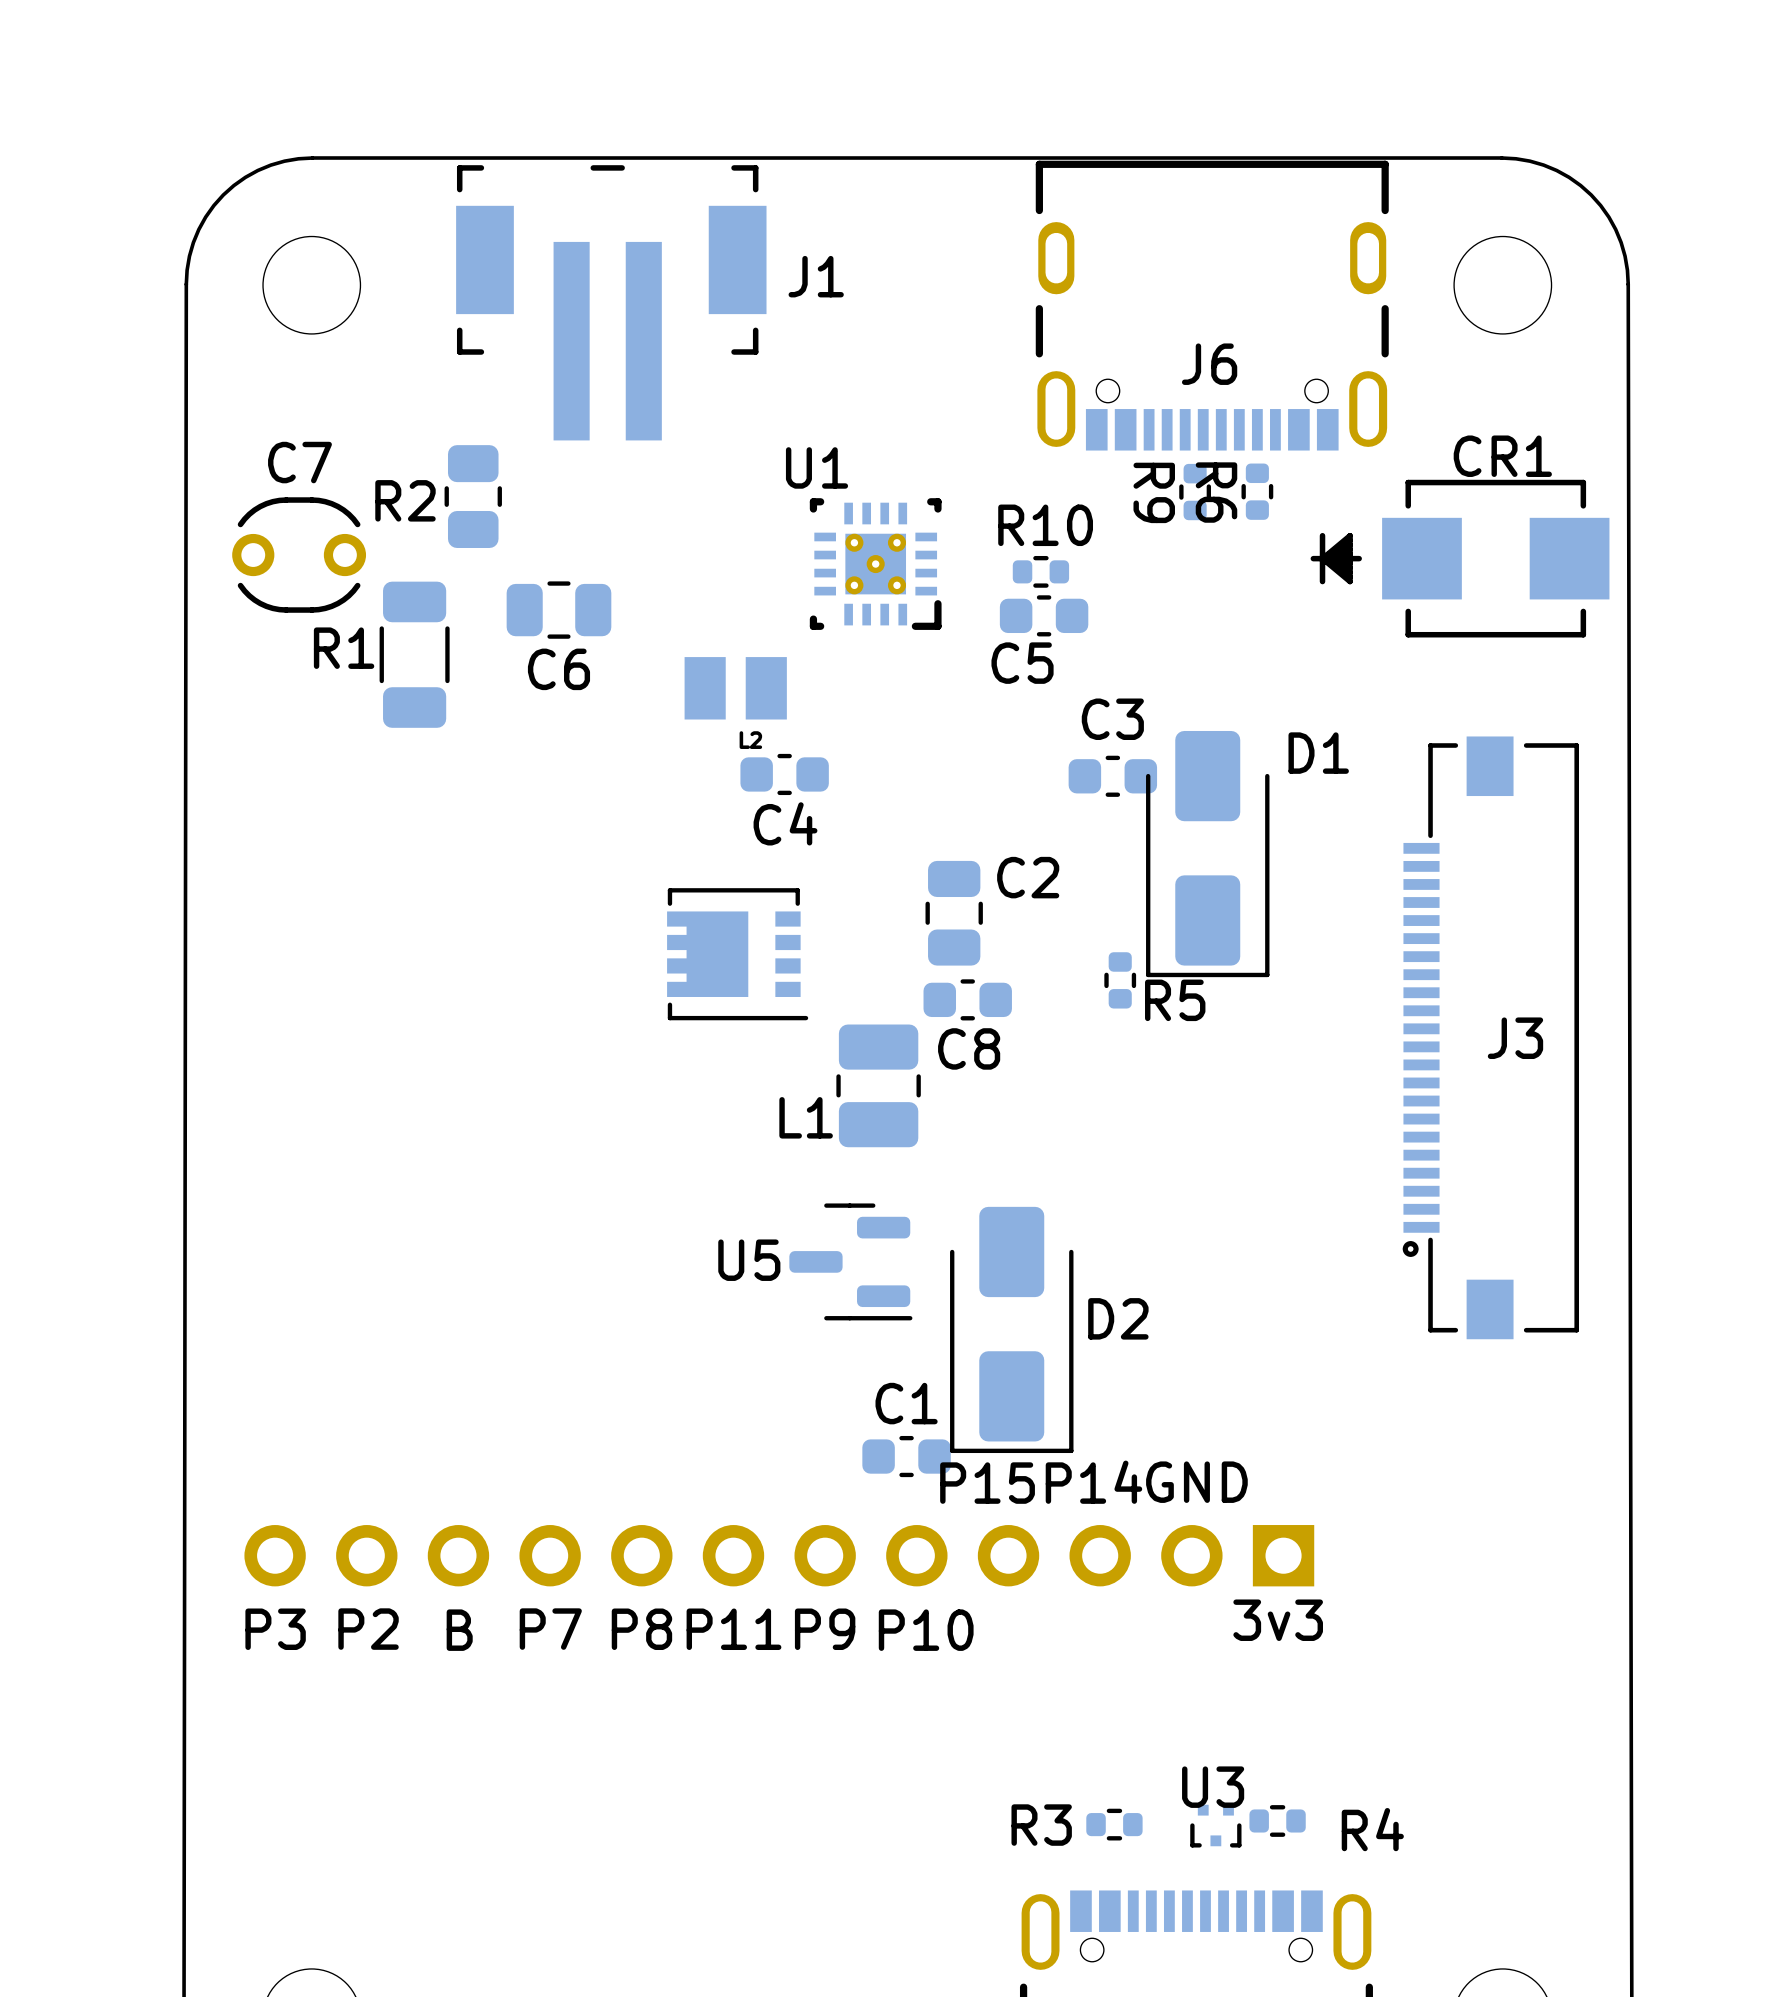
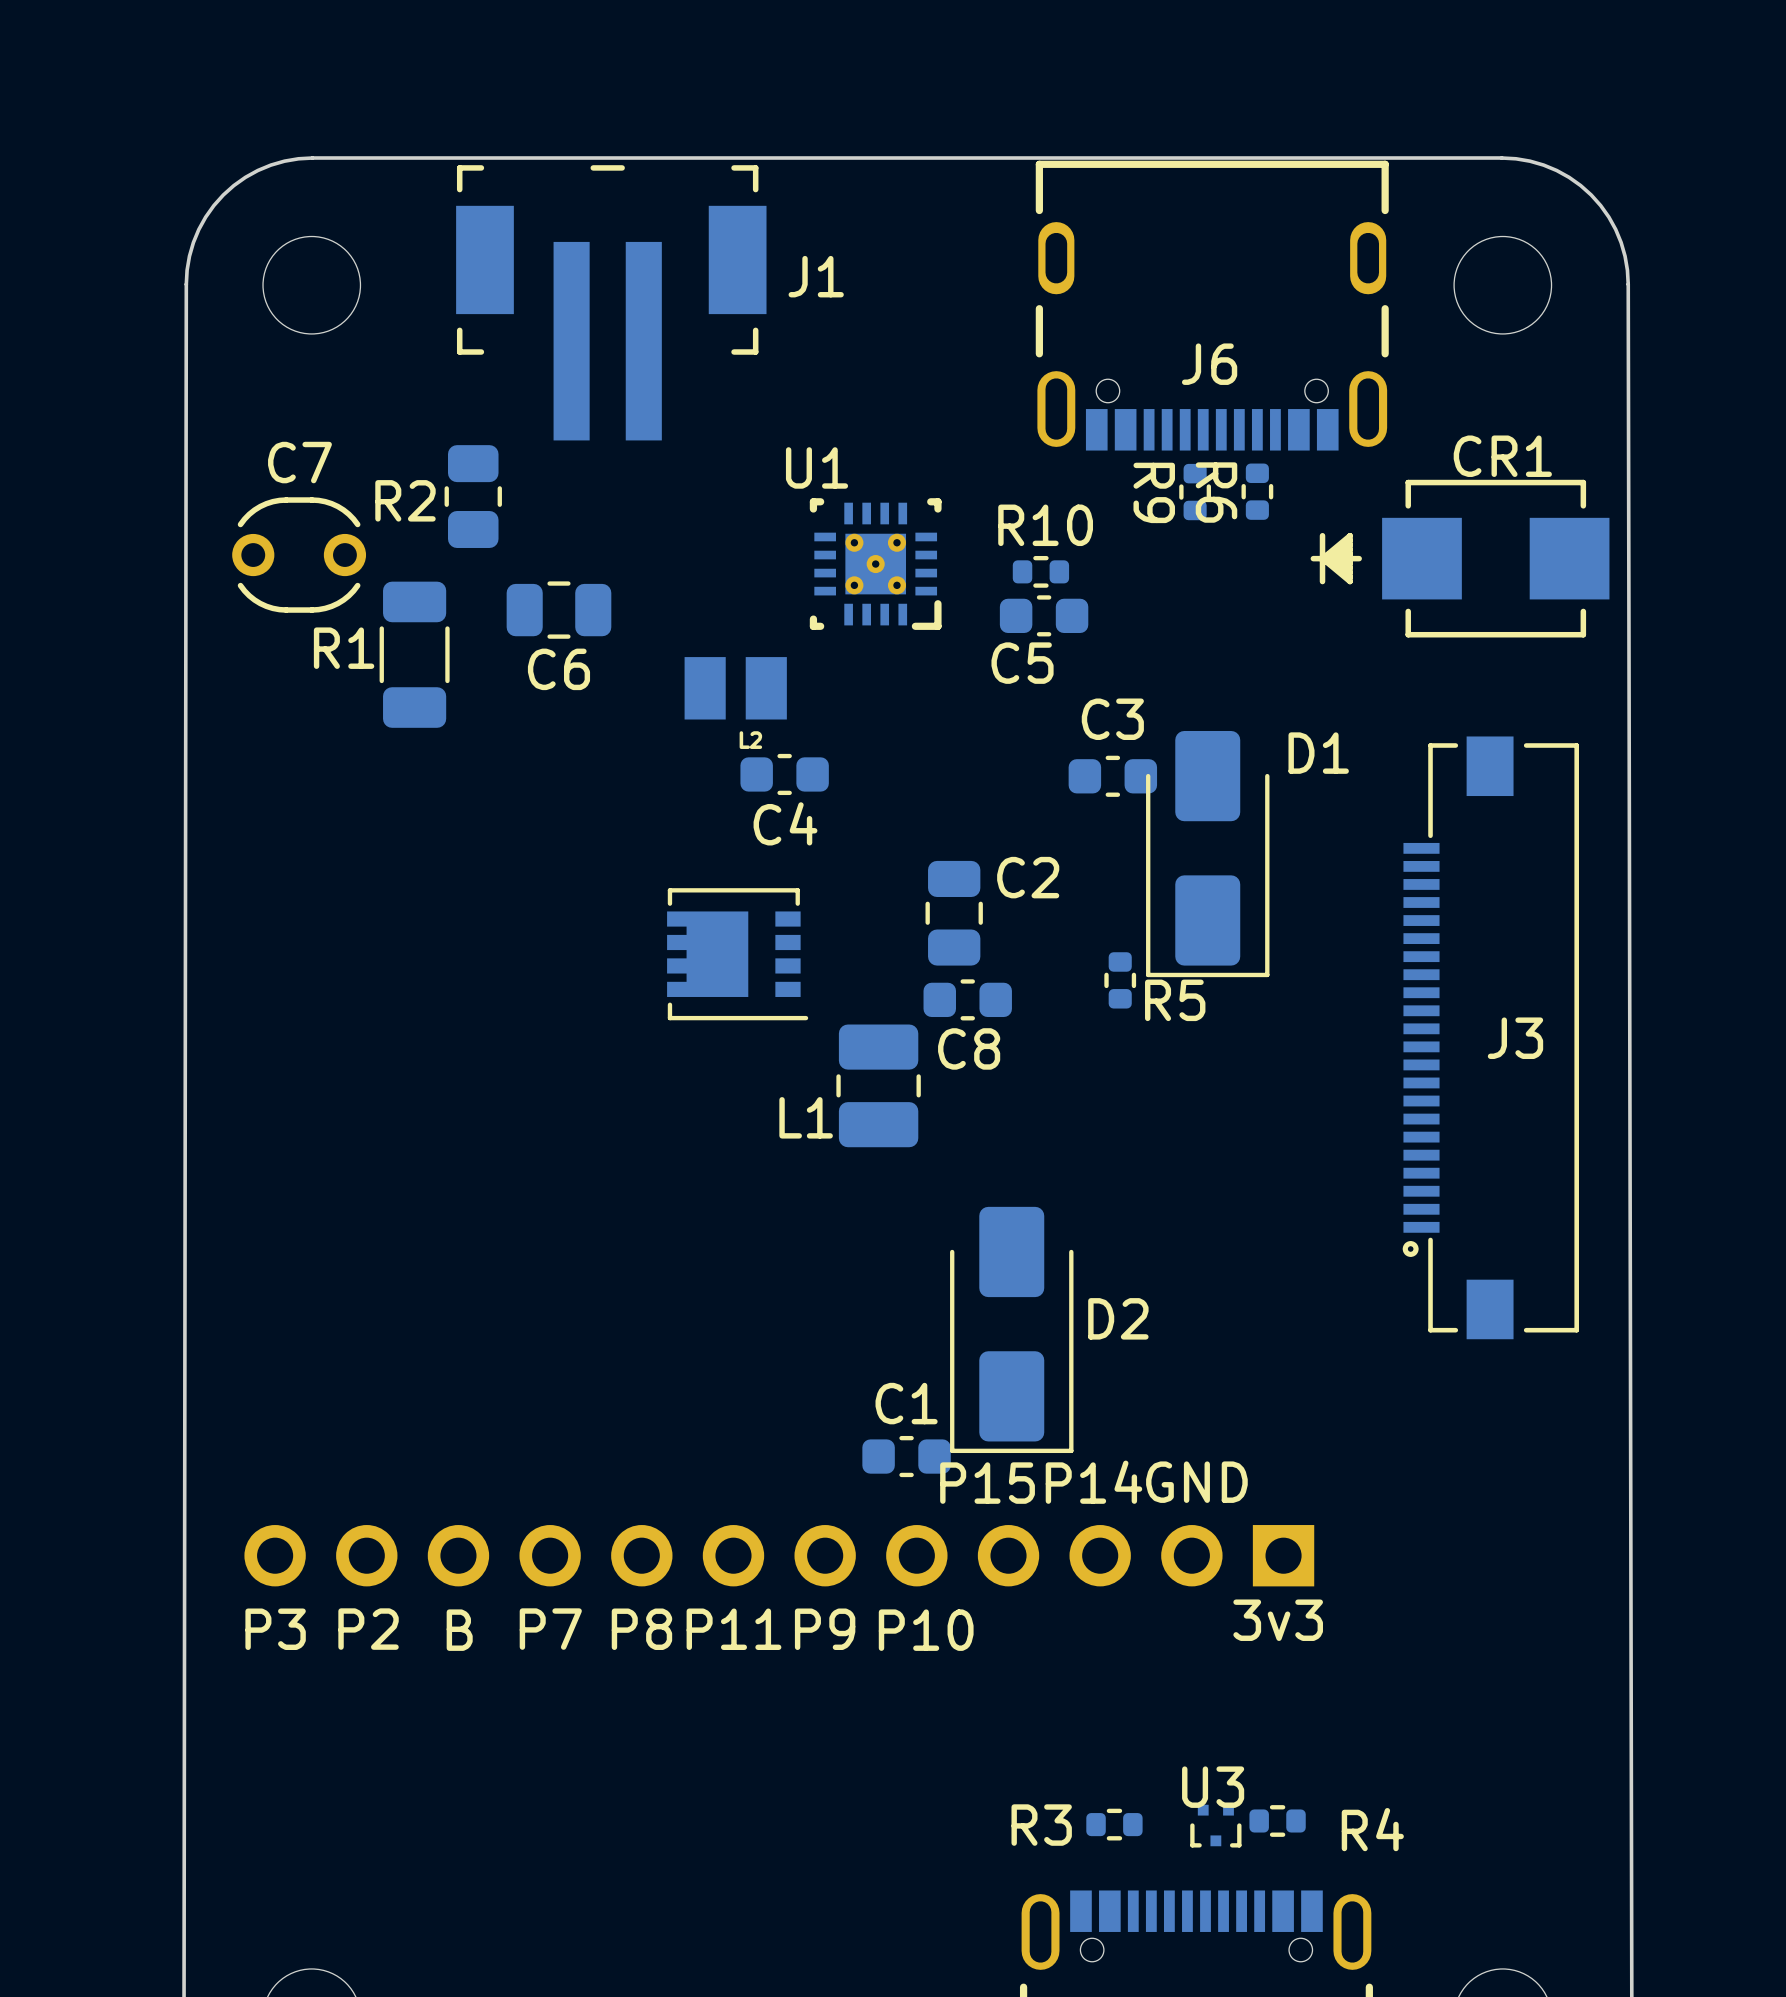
U5: (850, 1261) -> none

